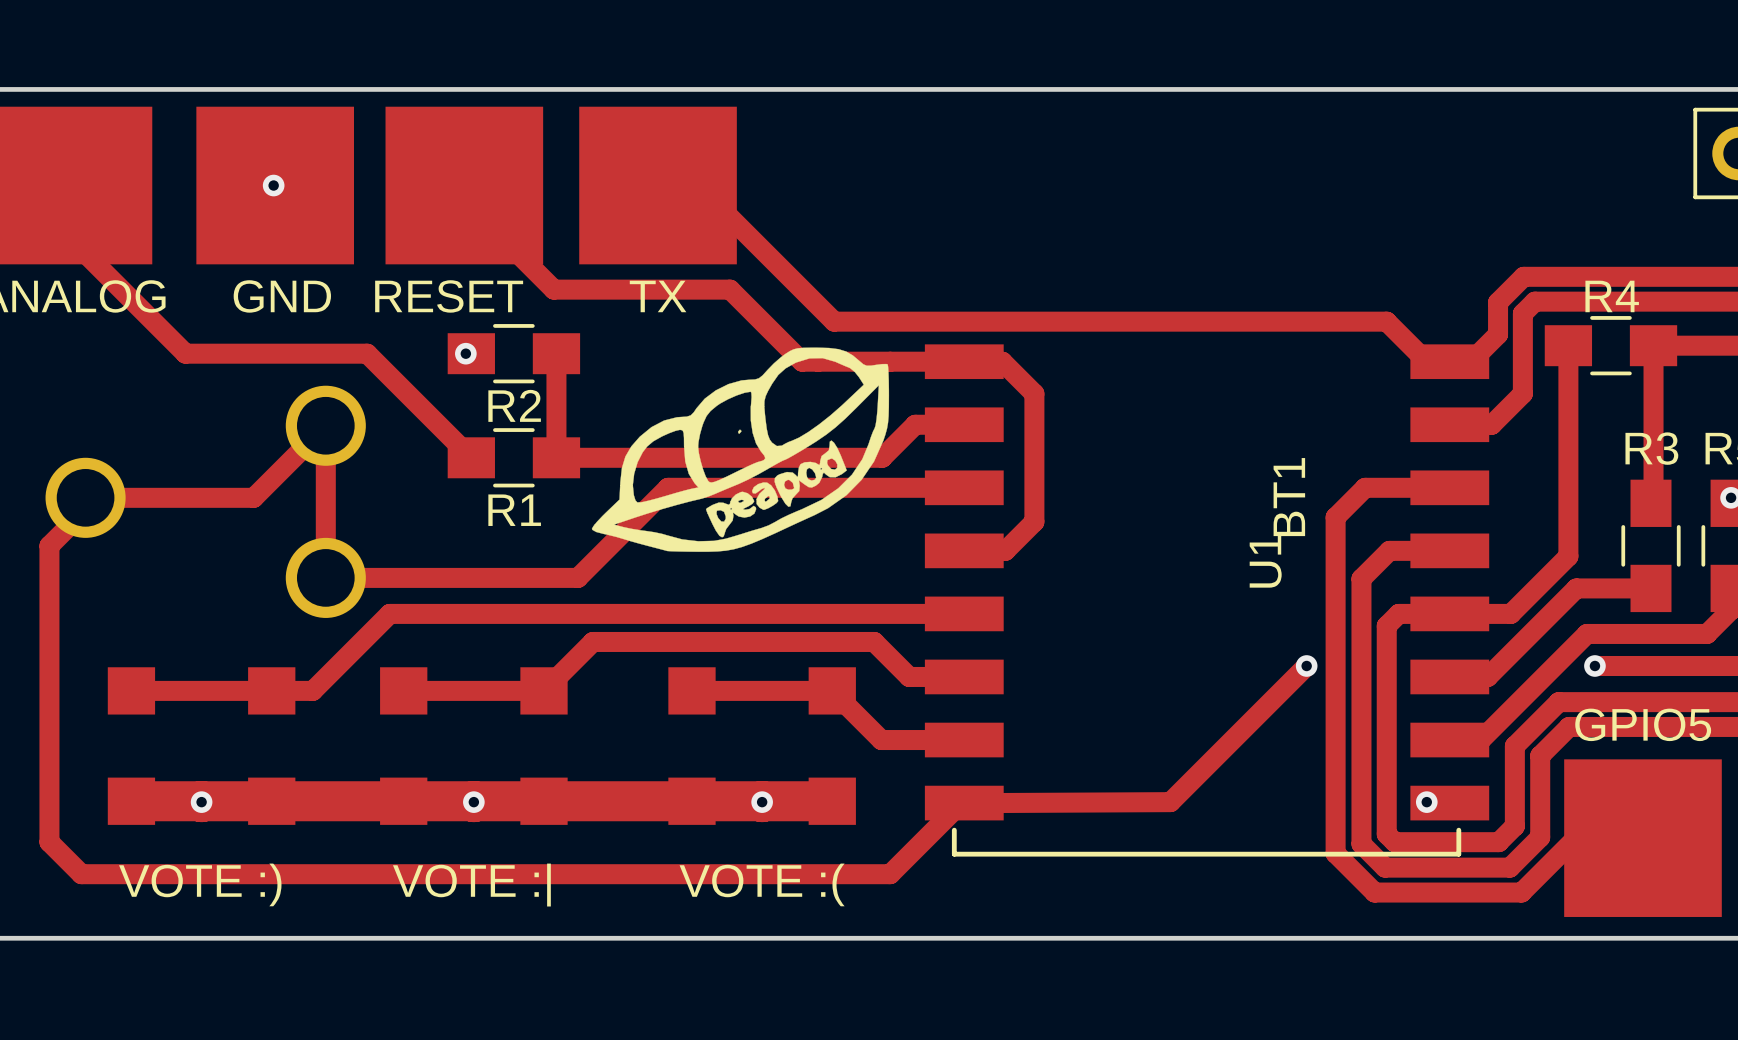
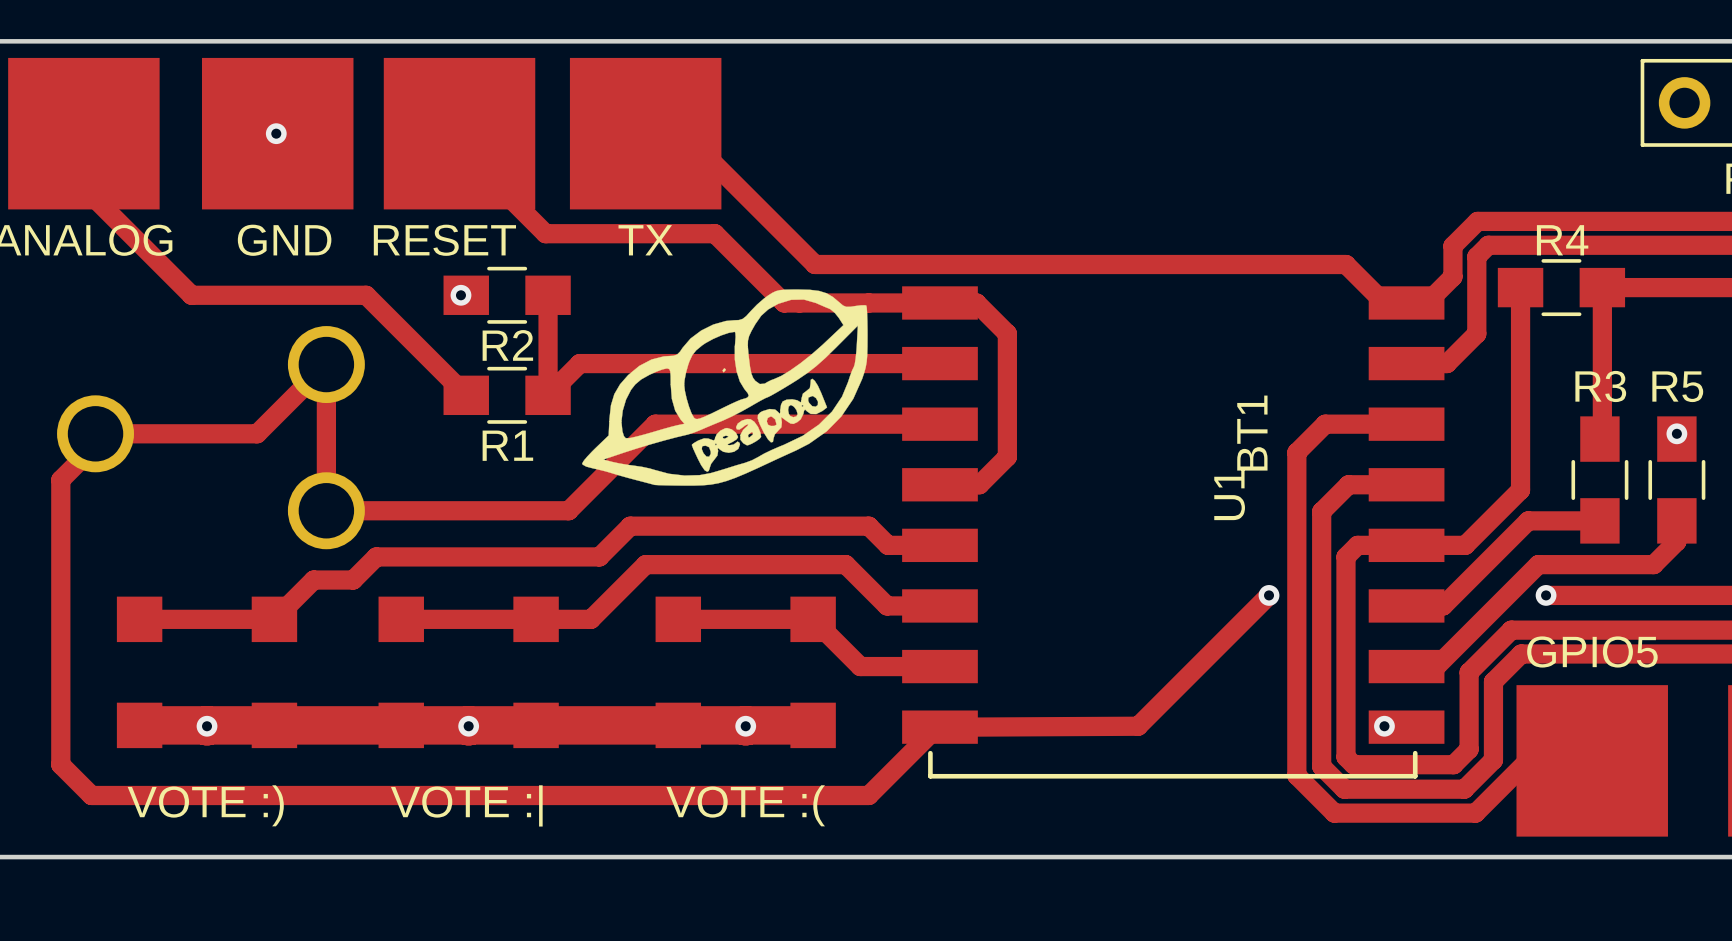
track: (915, 424) (882, 457) (556, 457) -> (892, 363) (579, 363) (548, 395)
track: (910, 613) (389, 613) (377, 625) -> (888, 545) (868, 526) (630, 526) (599, 556) (376, 556)
track: (874, 641) (592, 641) (544, 690) -> (853, 572) (845, 564) (645, 564) (590, 619) (536, 619)
track: (353, 649) (312, 690) (271, 690) -> (353, 580) (313, 580) (274, 619)

